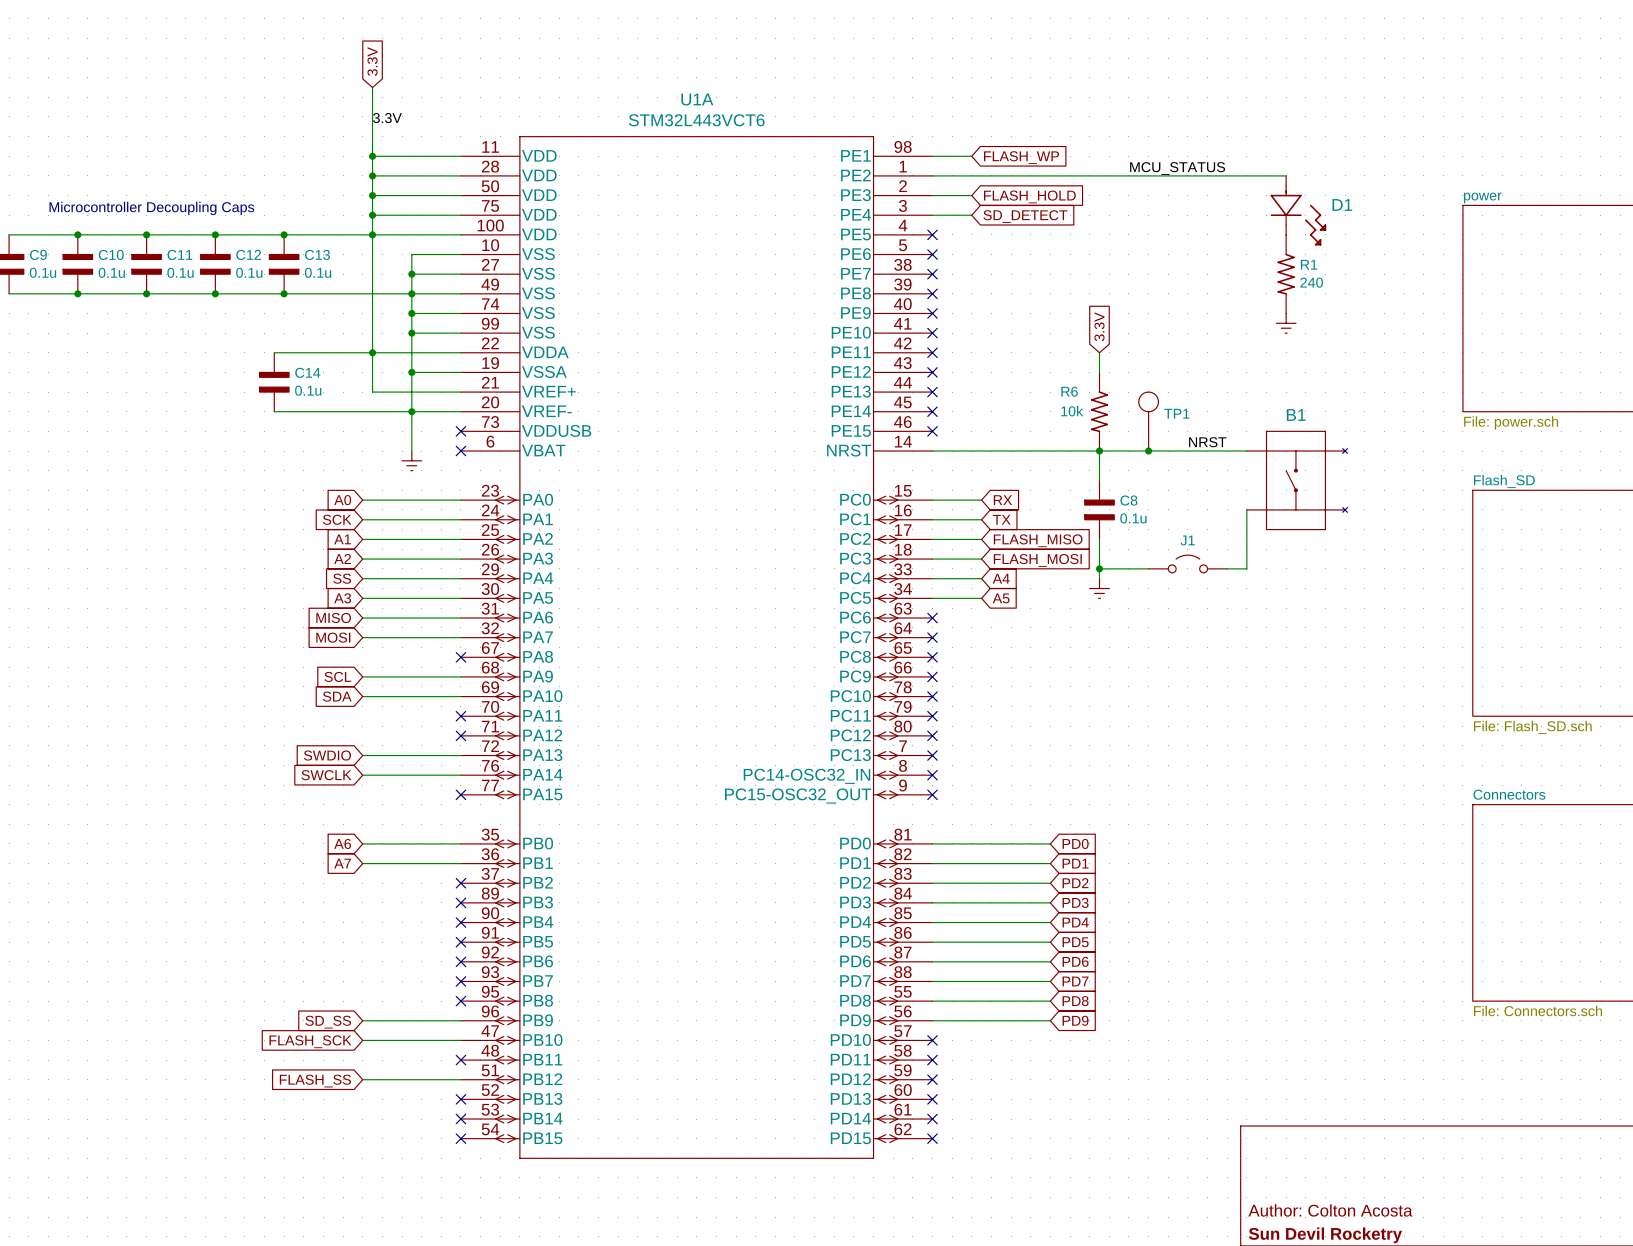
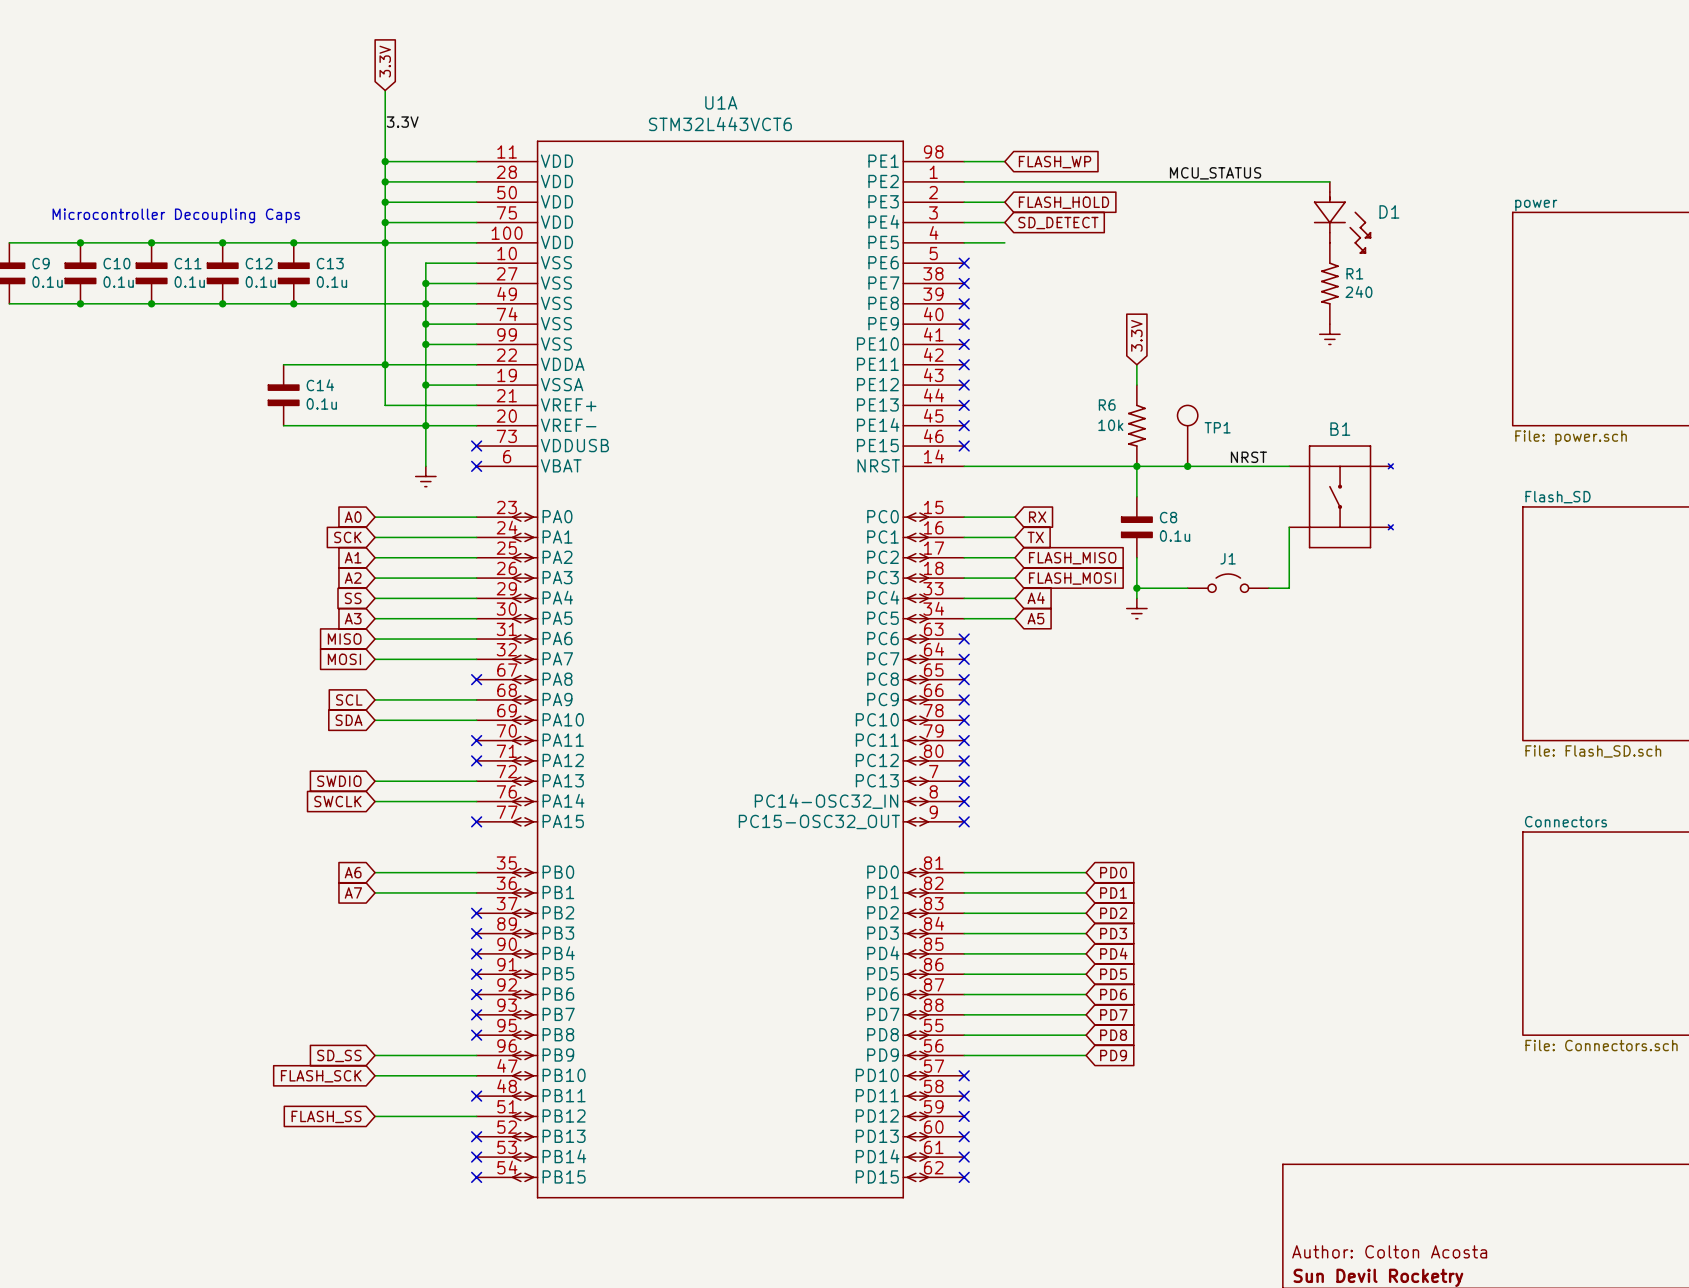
wire: none -> (964, 242) (1004, 242)
no-connect mark: (932, 234) -> none

